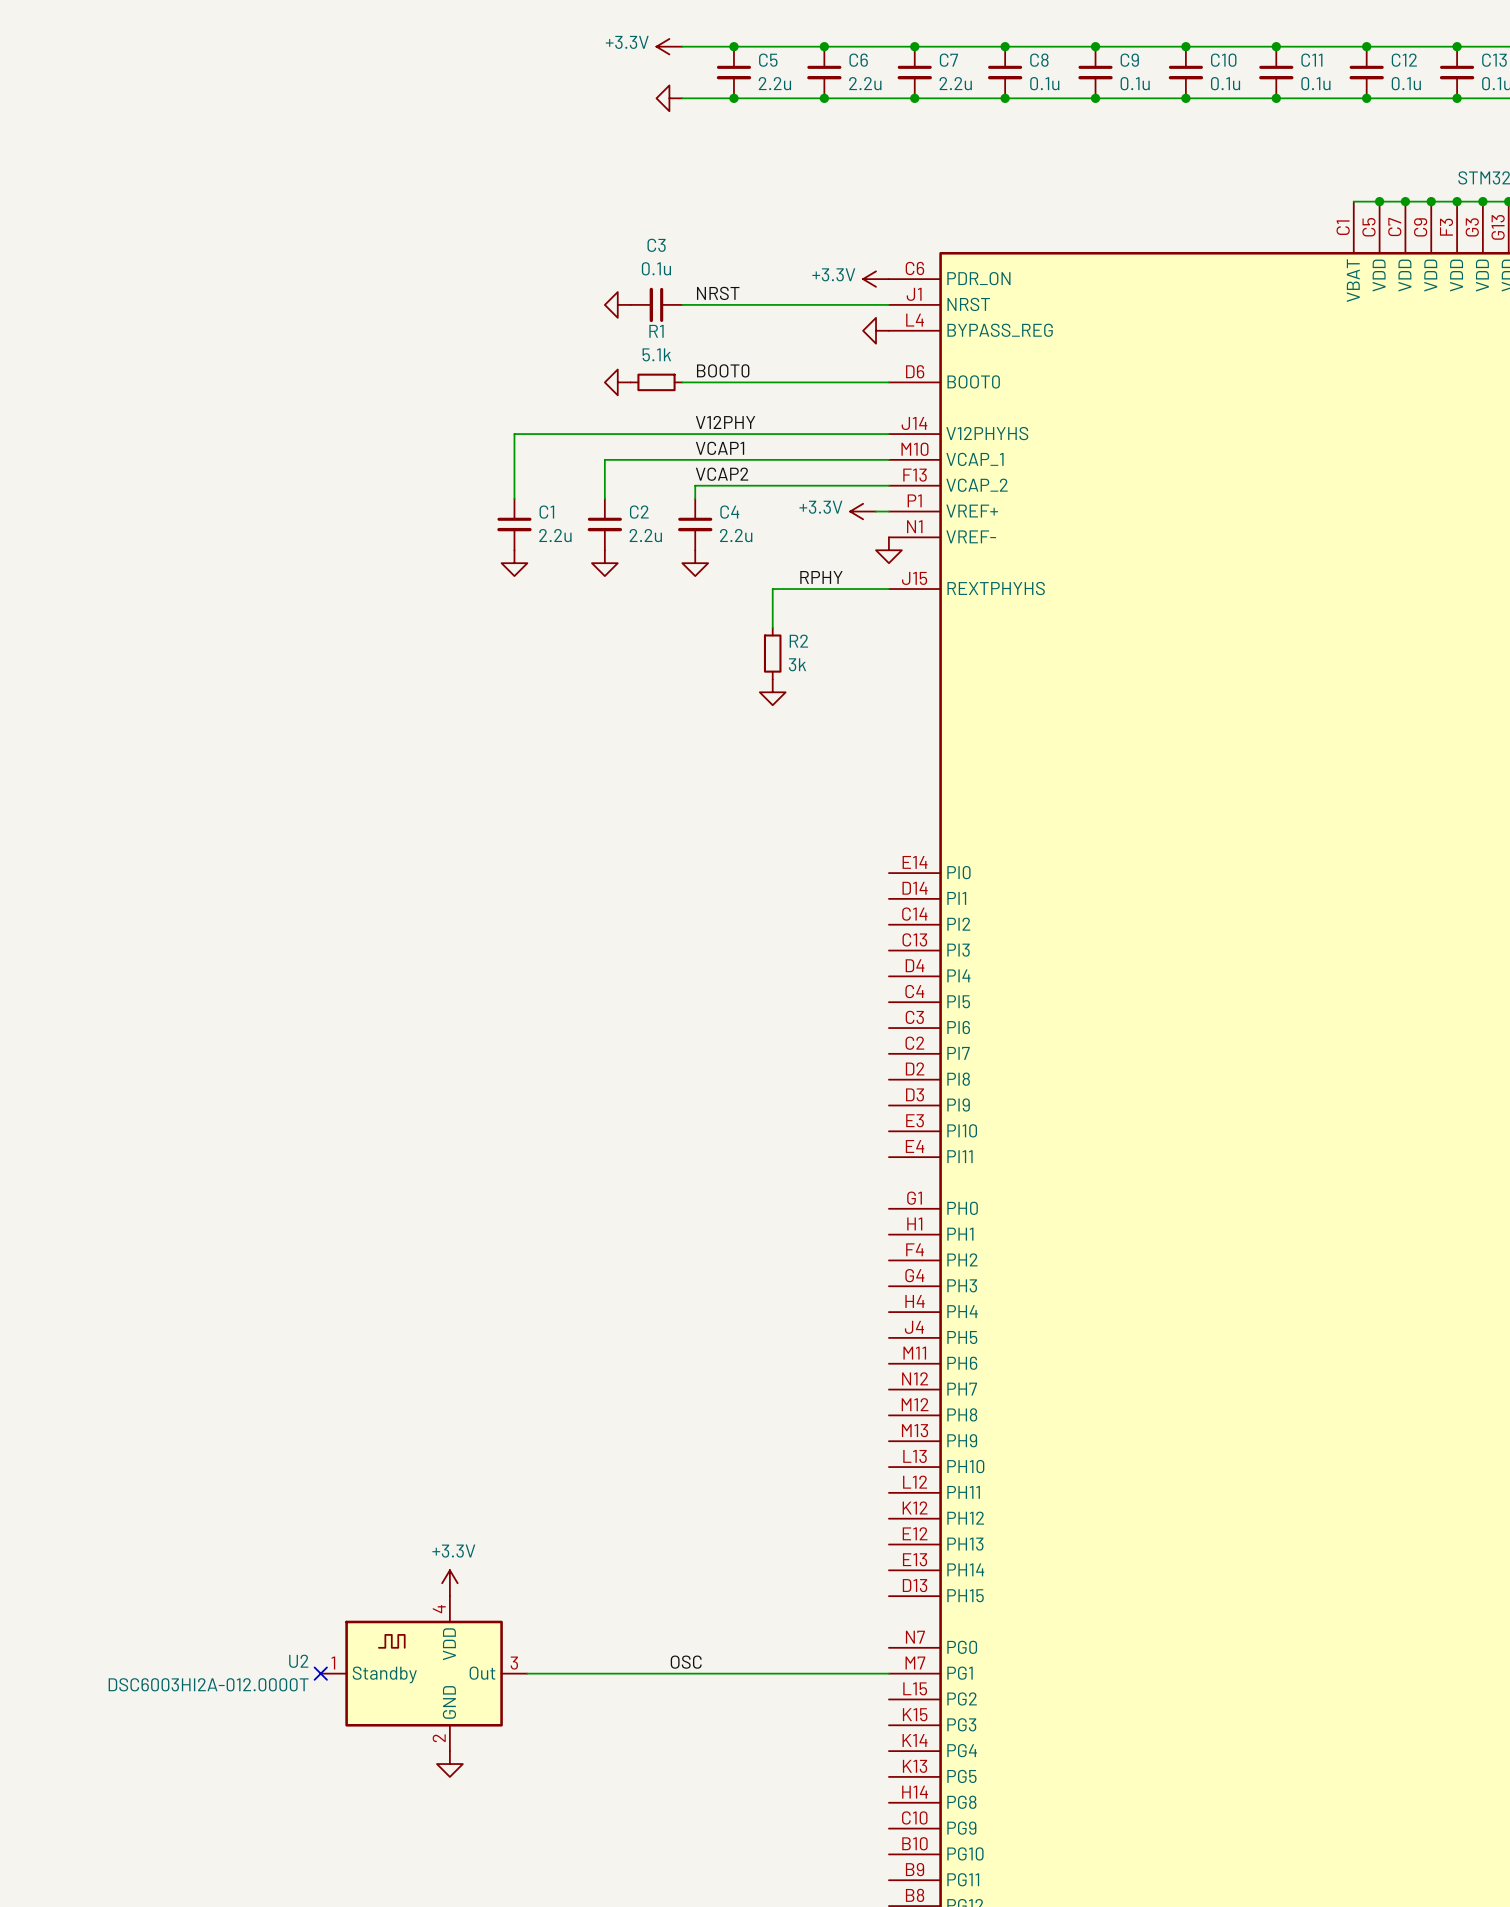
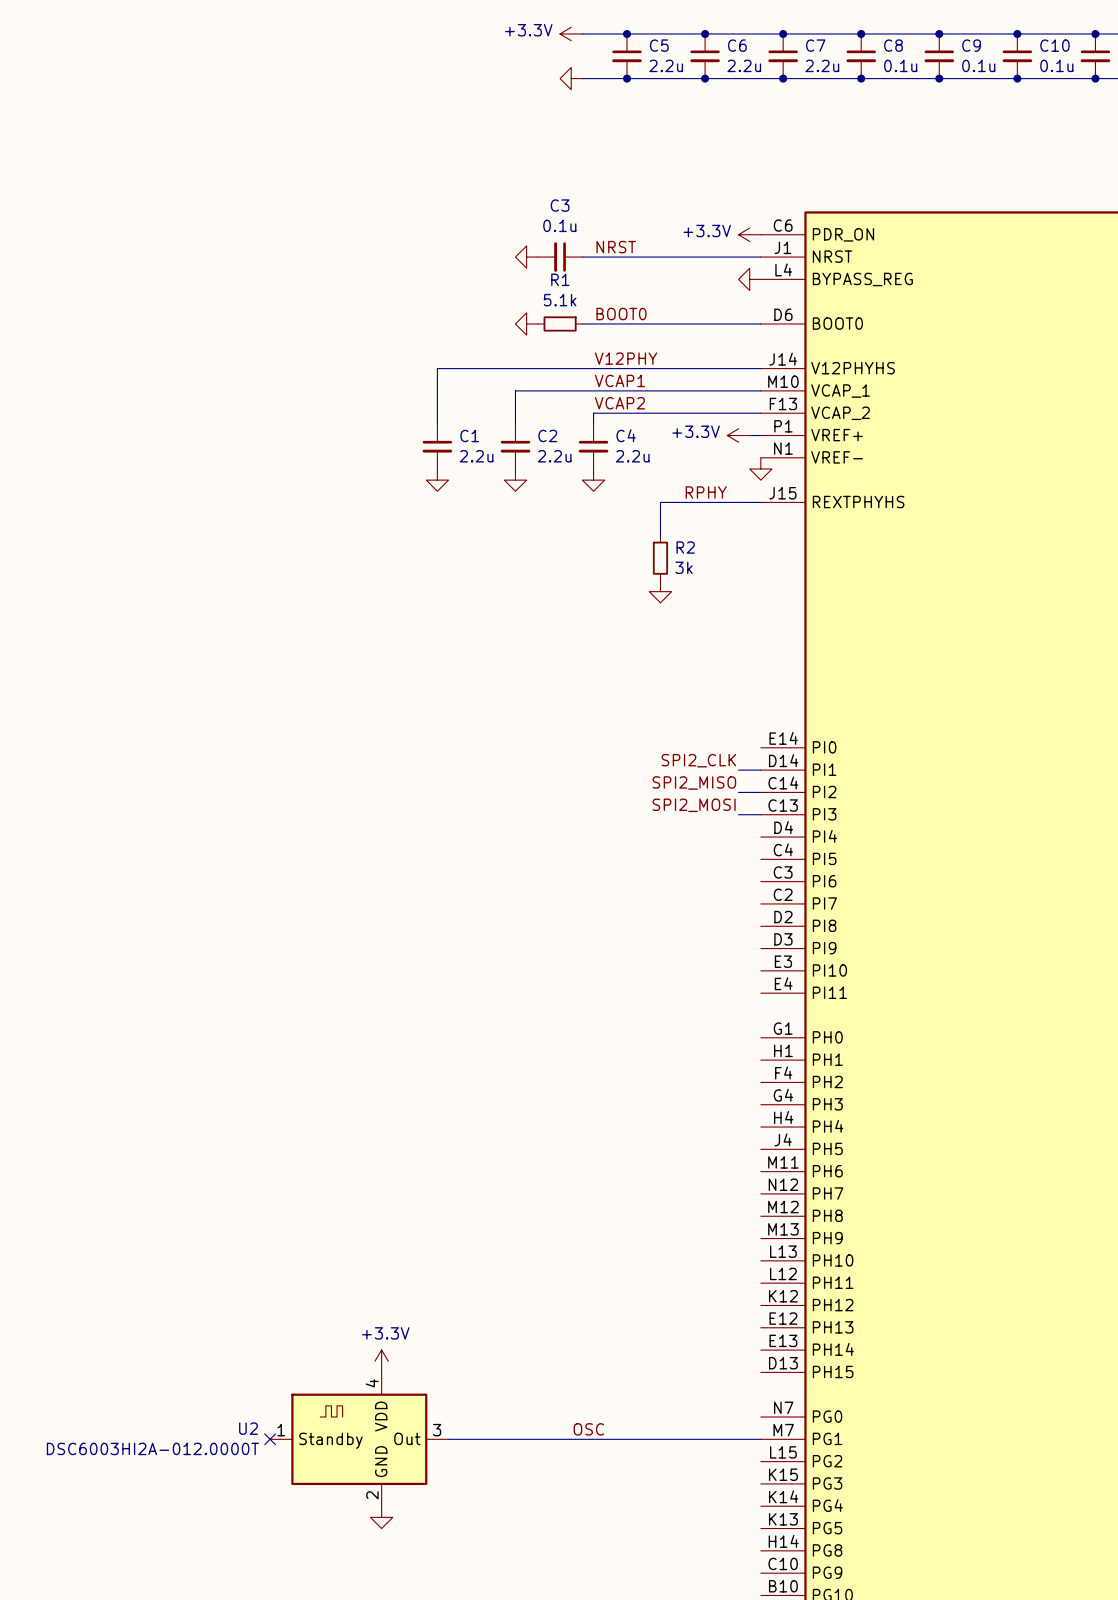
label: none -> SPI2_CLK (698, 760)
wire: none -> (738, 770) (760, 770)
label: none -> SPI2_MISO (694, 783)
wire: none -> (738, 792) (760, 792)
label: none -> SPI2_MOSI (694, 805)
wire: none -> (738, 814) (760, 814)

